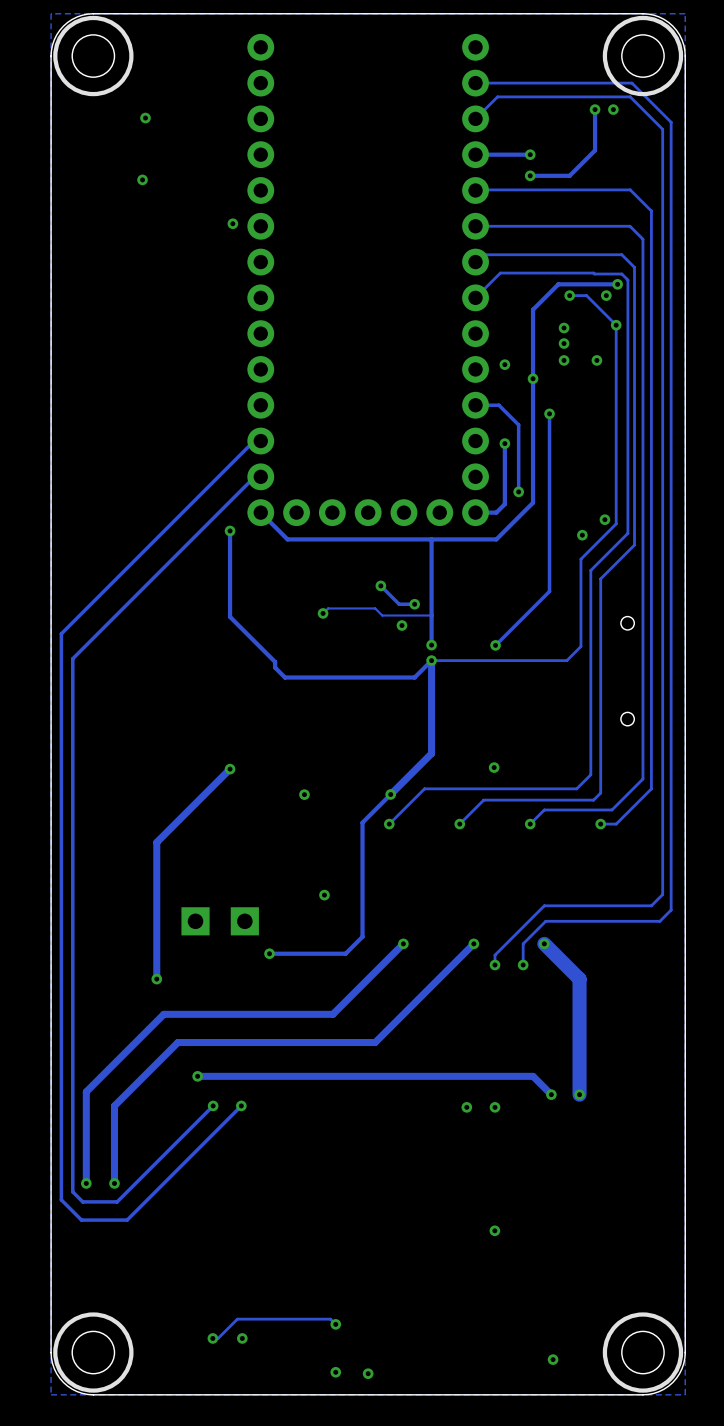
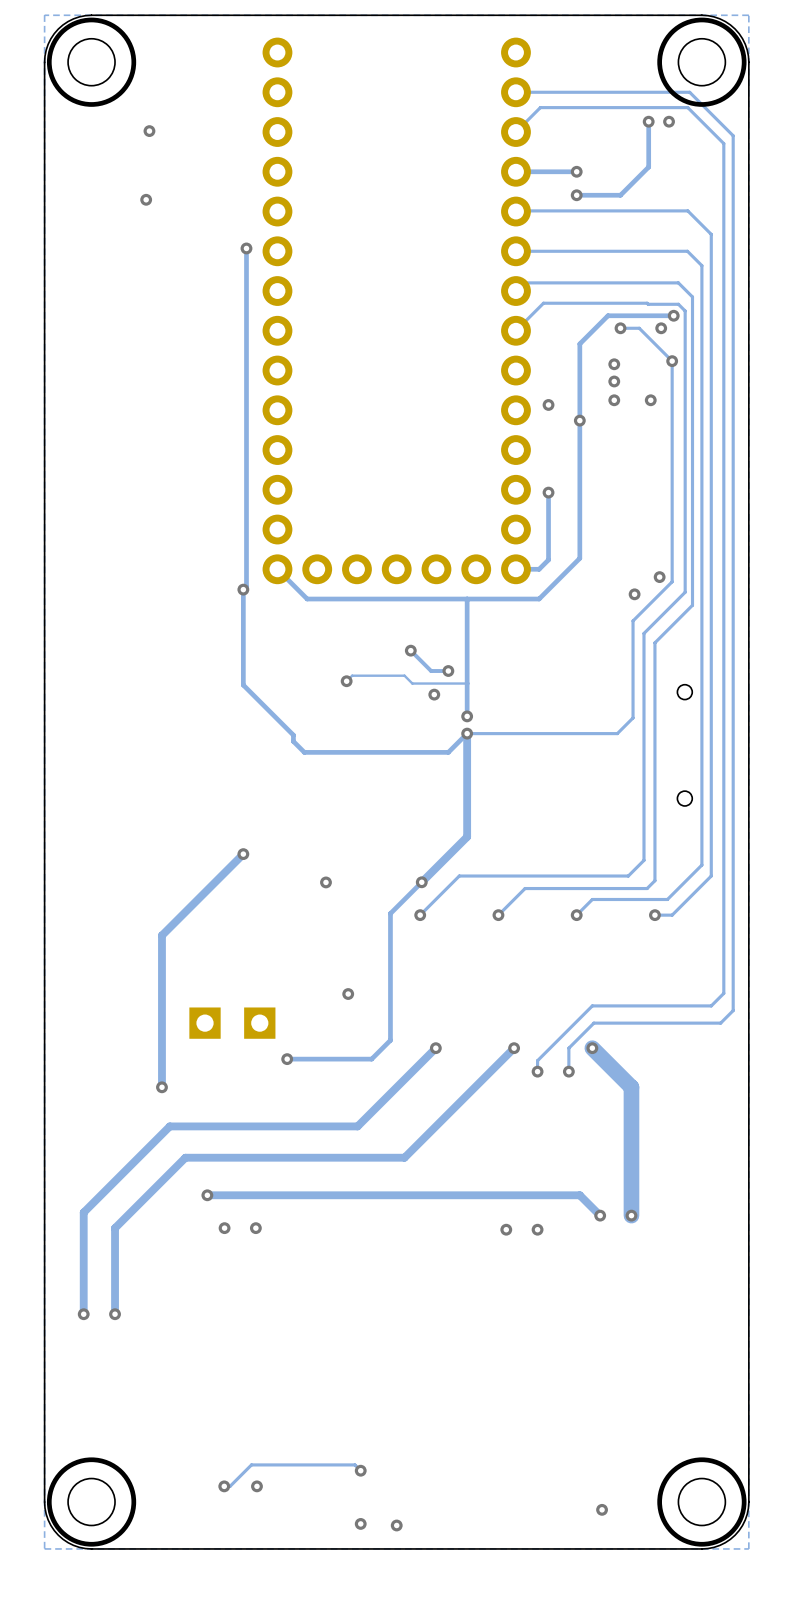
track: none -> (246, 248) (246, 586) (243, 589)
track: (475, 405) (498, 405) (518, 424) (518, 491) -> none
track: (549, 413) (549, 591) (495, 645) -> none
via: (549, 413) -> none
track: (260, 441) (254, 441) (61, 633) (61, 1199) (81, 1220) (127, 1220) (241, 1105) -> none
track: (260, 476) (254, 476) (72, 658) (72, 1191) (82, 1201) (117, 1201) (213, 1105) -> none
via: (518, 491) -> none
via: (495, 645) -> none
via: (494, 767) -> none
via: (494, 1230) -> none

